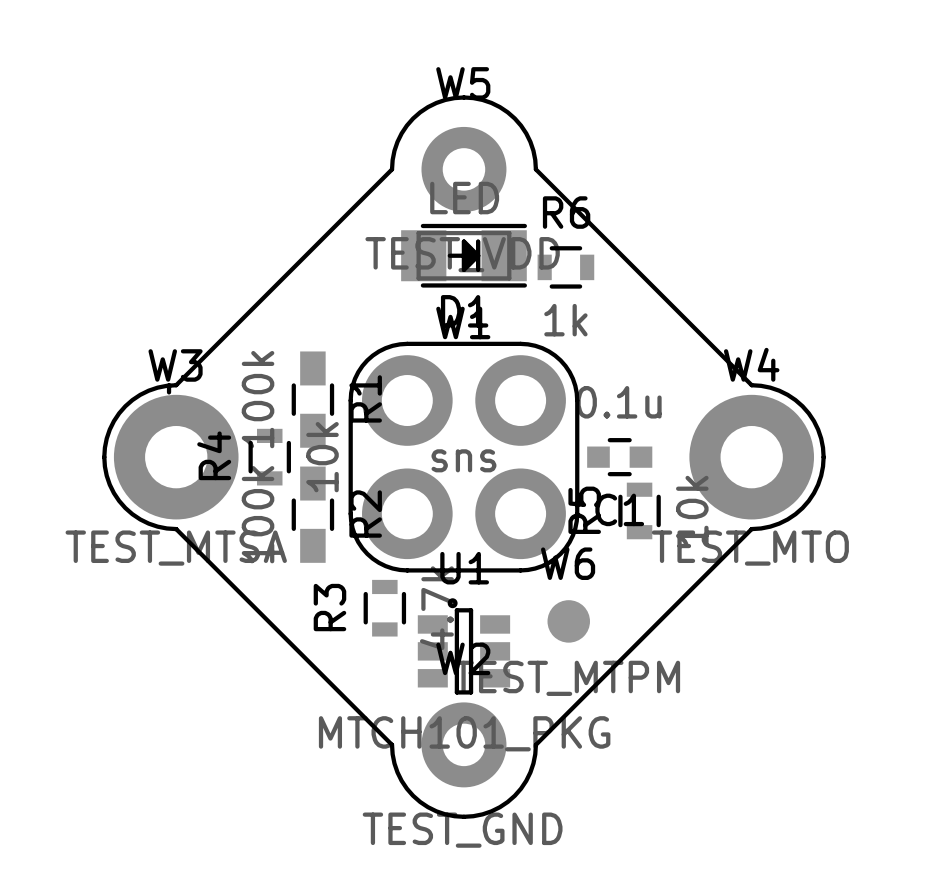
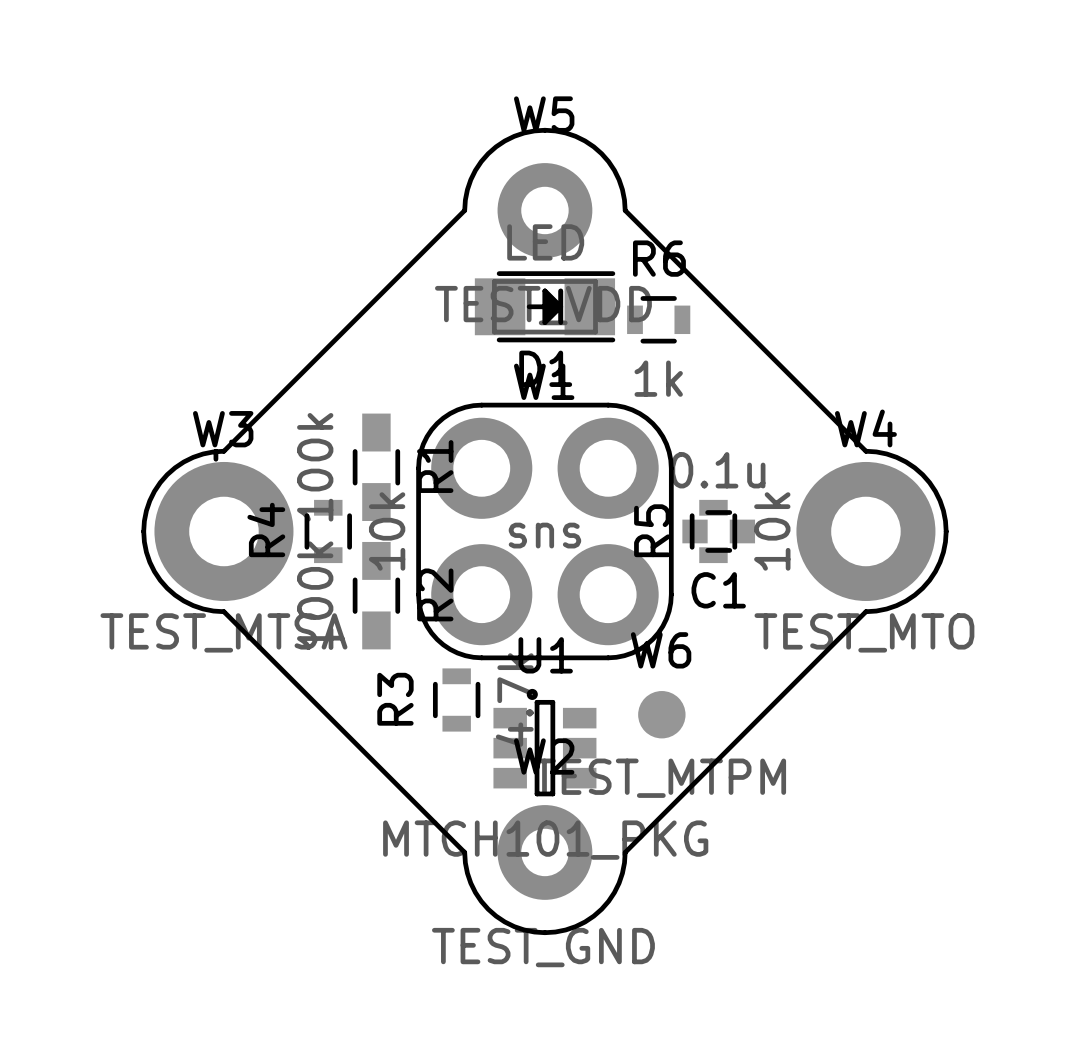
R5 position: (639, 510) -> (713, 531)

